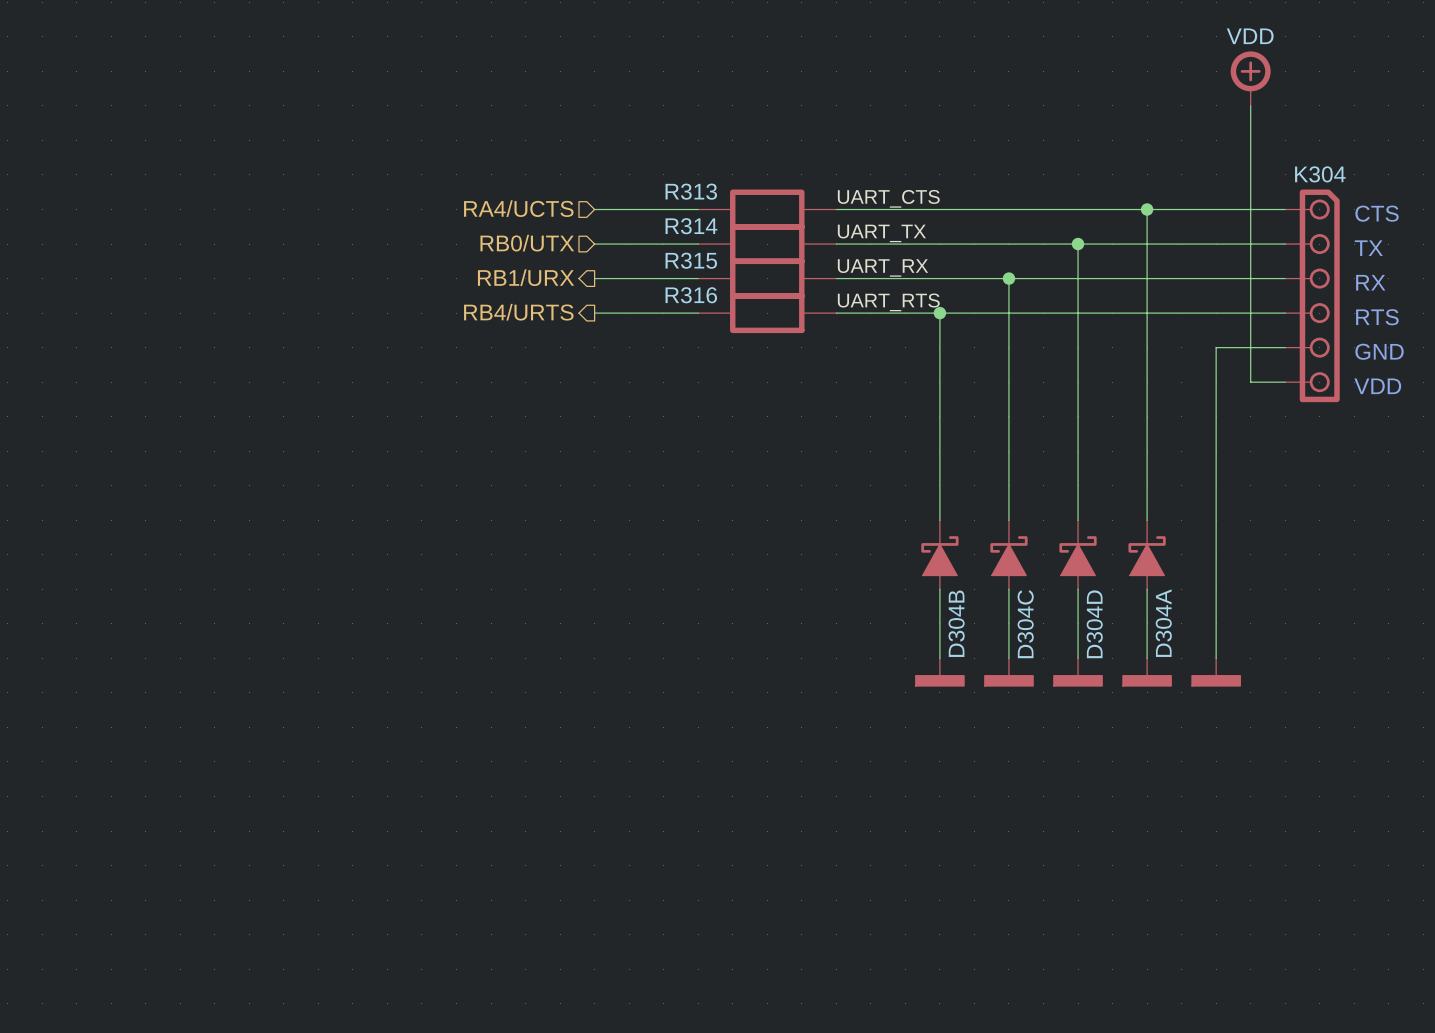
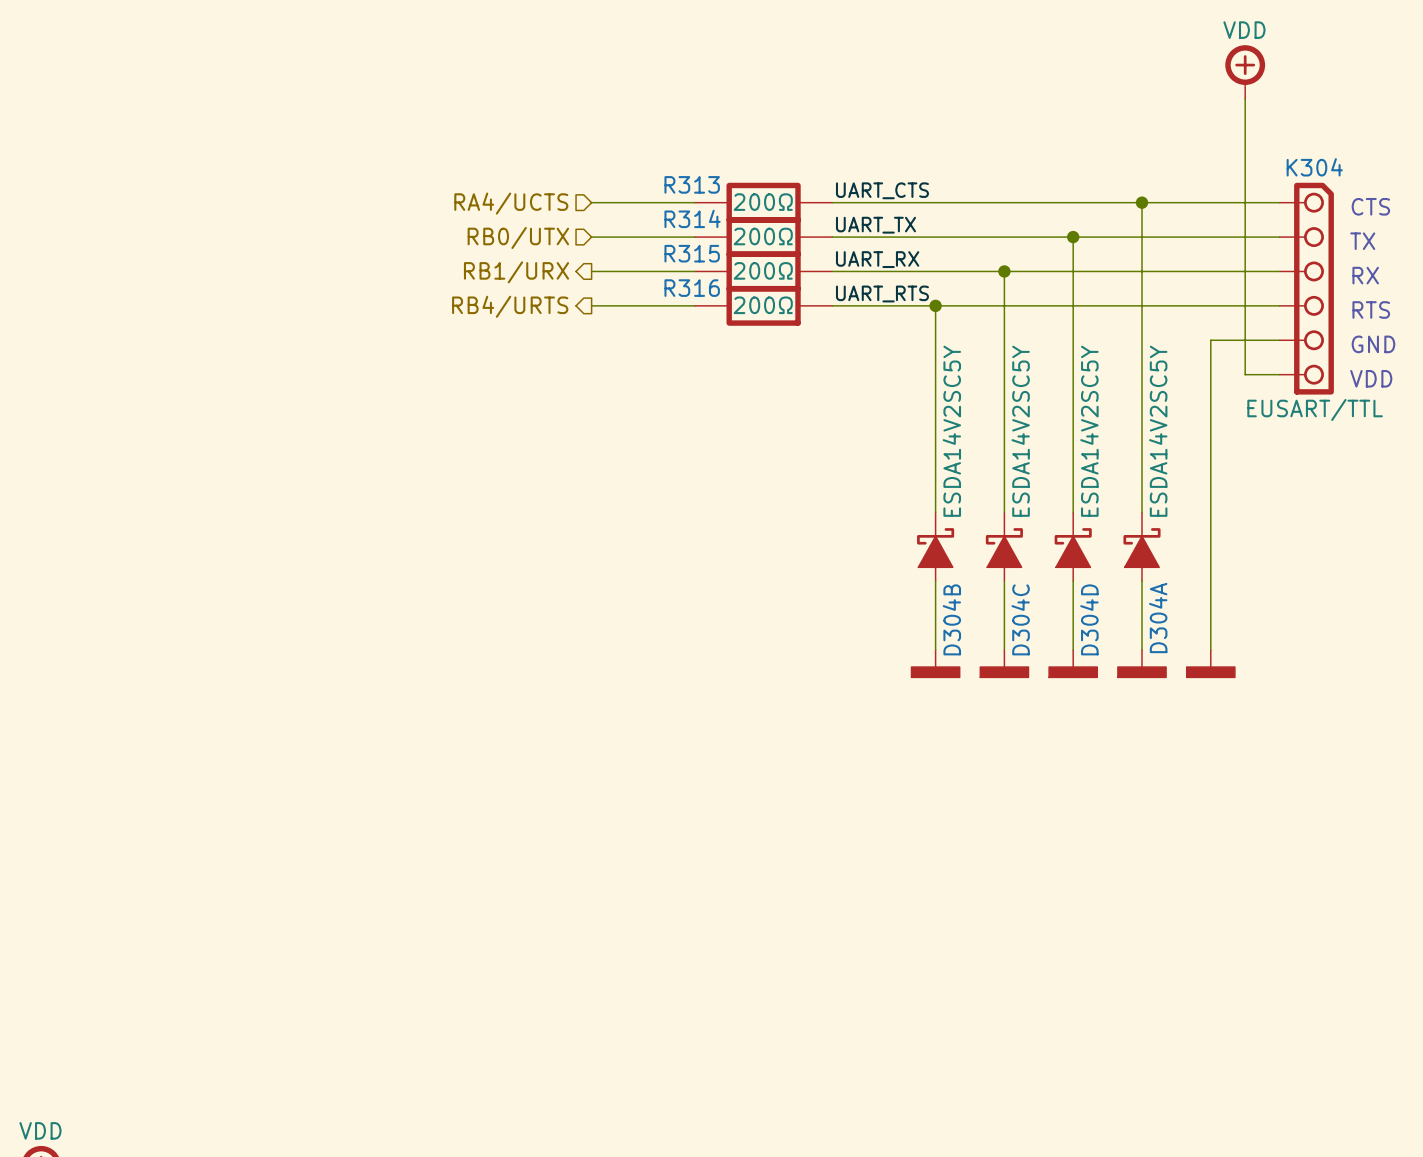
R313 value: none -> 200Ω (763, 202)
R314 value: none -> 200Ω (763, 236)
R315 value: none -> 200Ω (763, 270)
R316 value: none -> 200Ω (763, 305)
K304 value: none -> EUSART/TTL (1315, 409)
D304B value: none -> ESDA14V2SC5Y (951, 431)
D304C value: none -> ESDA14V2SC5Y (1020, 431)
D304D value: none -> ESDA14V2SC5Y (1089, 431)
D304A value: none -> ESDA14V2SC5Y (1158, 431)

